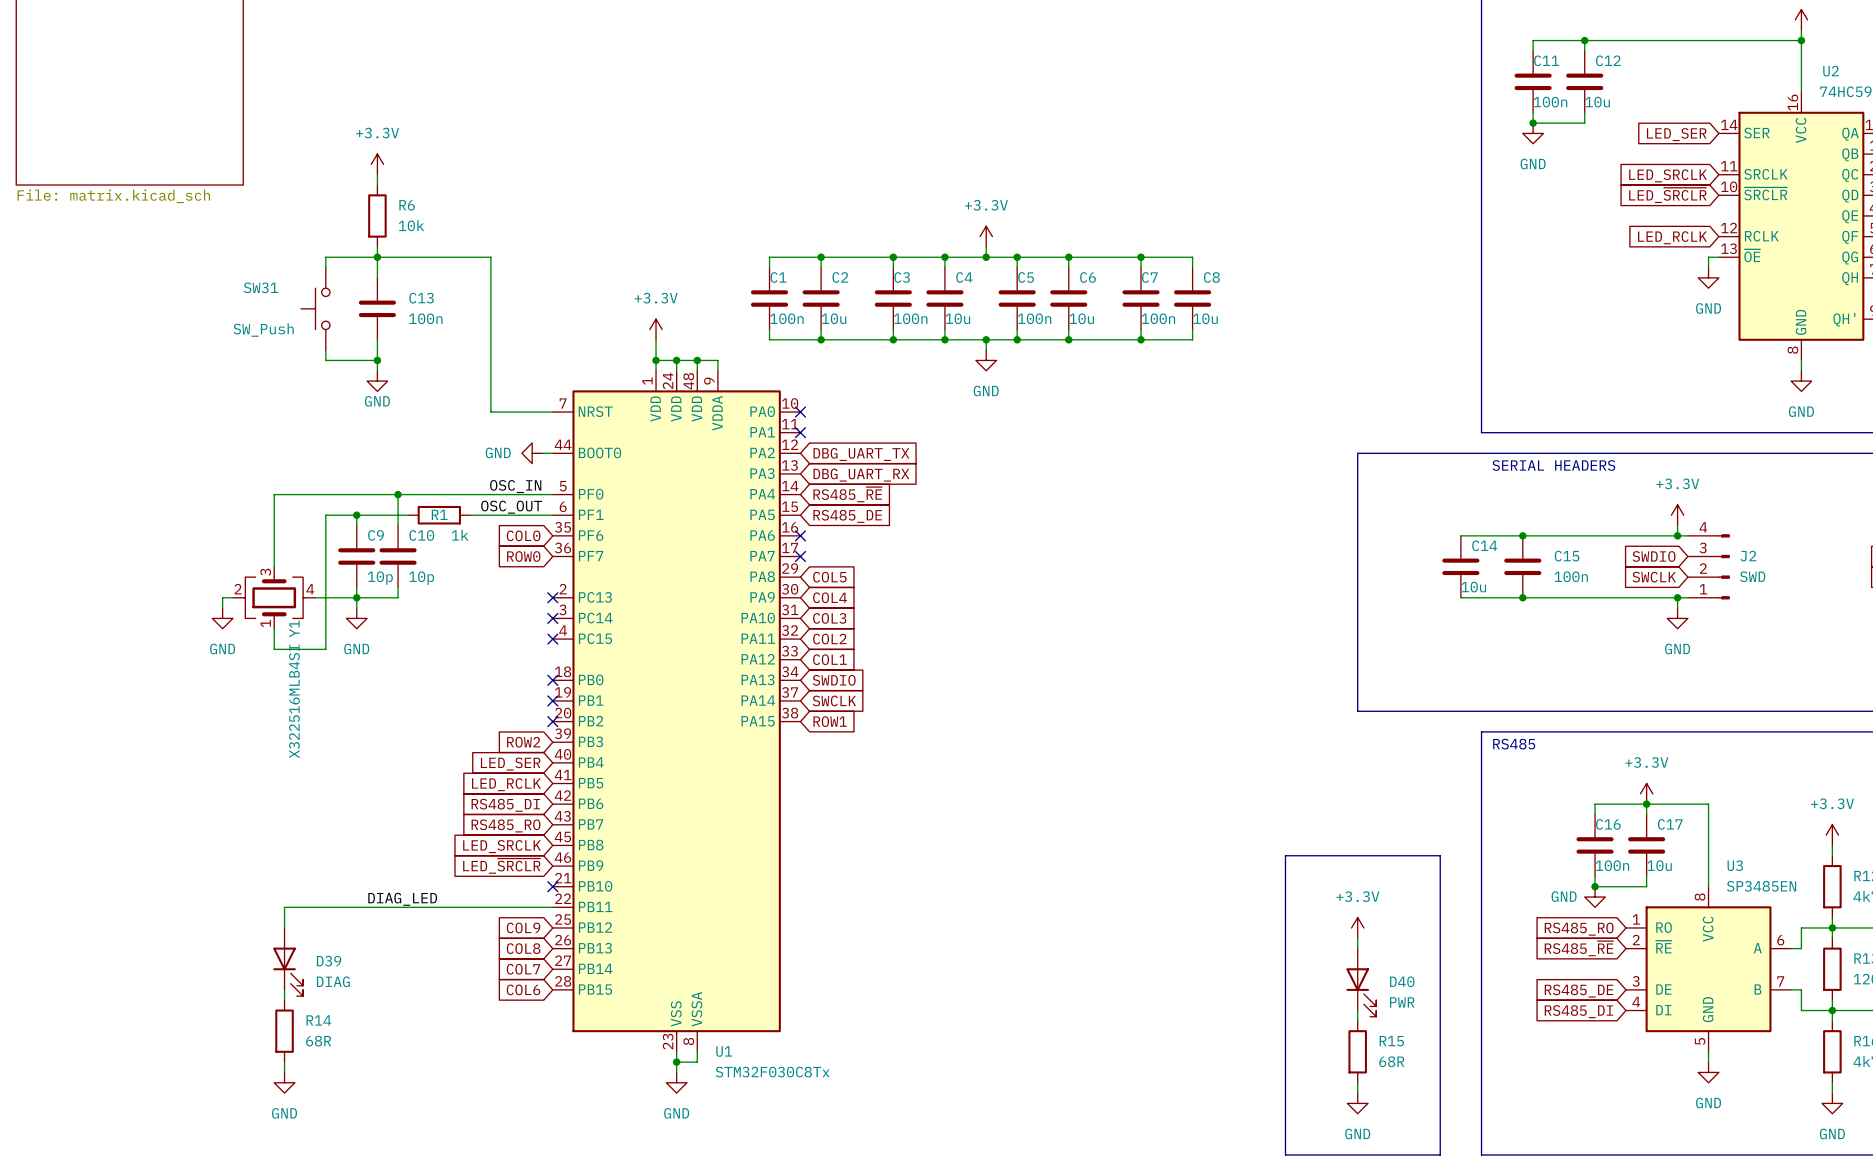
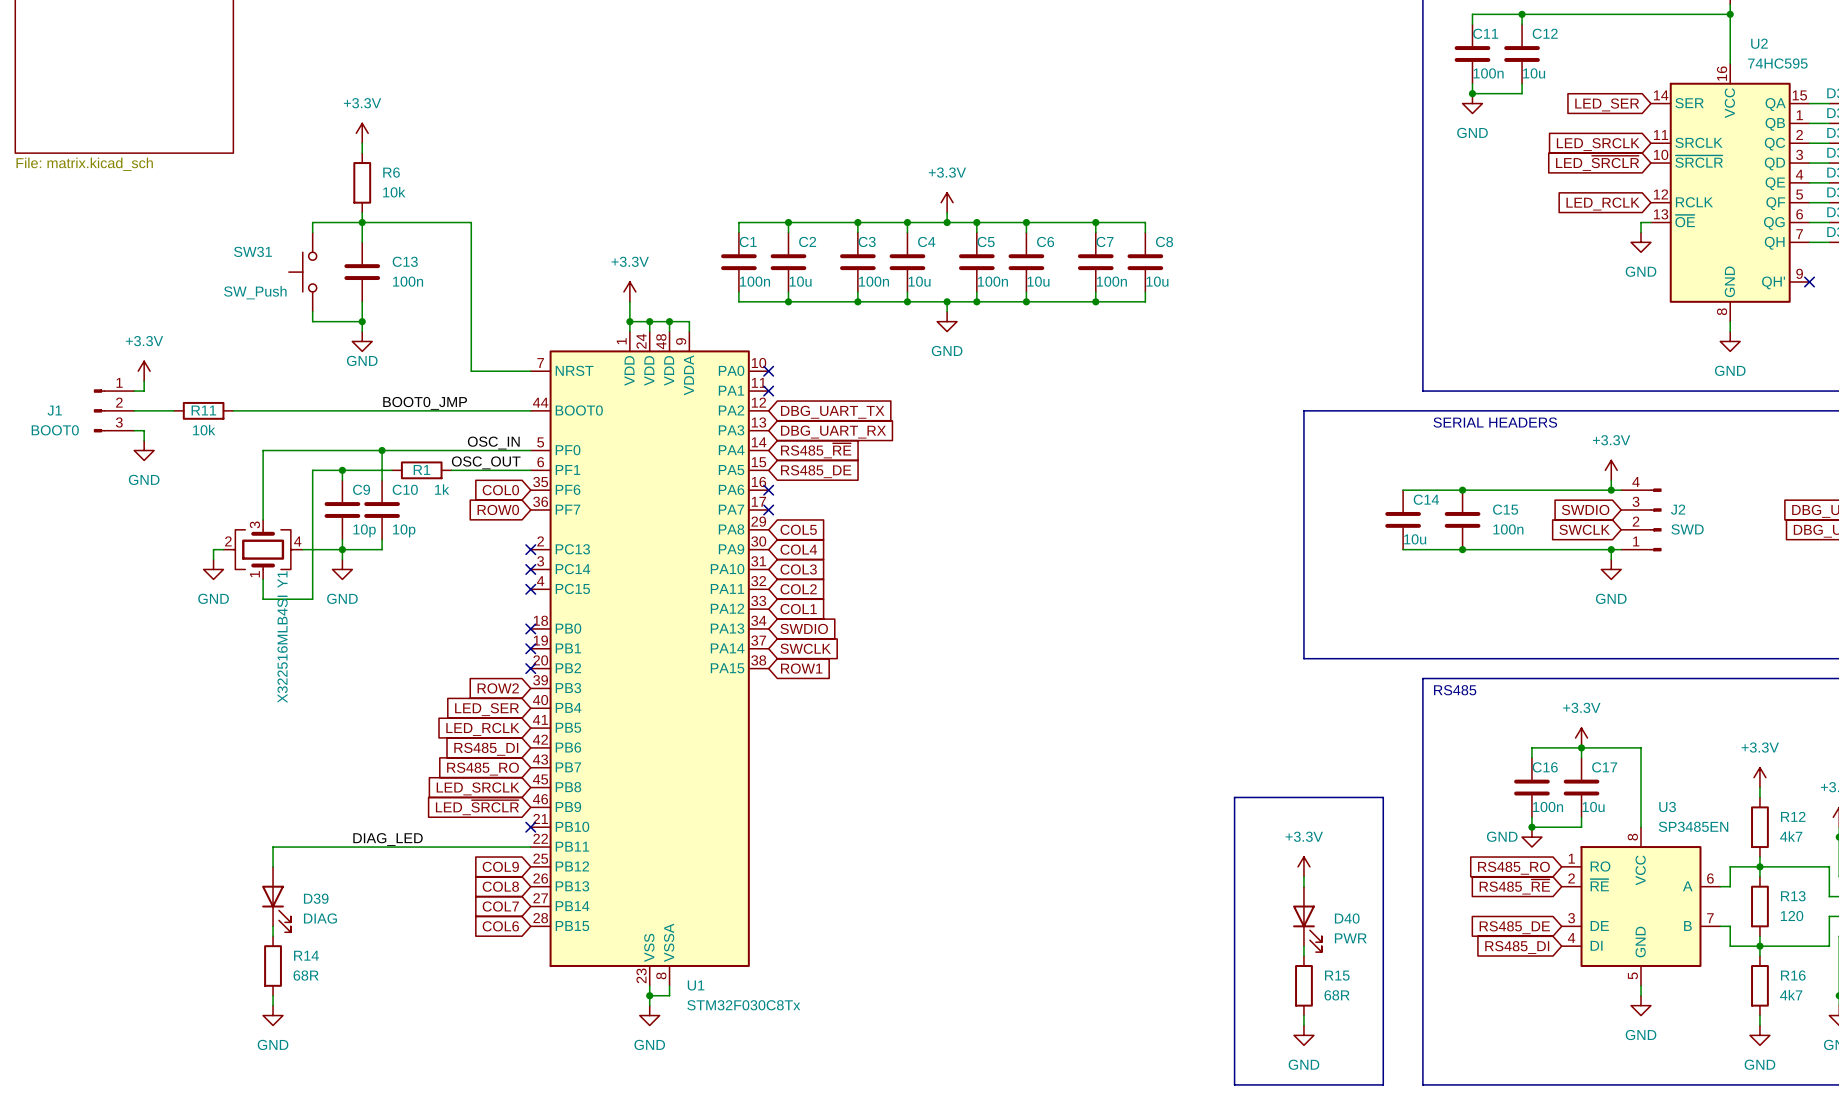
power symbol: none -> +3.3V (144, 371)
wire: none -> (144, 381) (144, 391) (134, 391)
label: none -> BOOT0_JMP (425, 403)
J1: none -> BOOT0 (114, 410)
wire: none -> (134, 410) (173, 410)
R11: none -> 10k (203, 410)
wire: none -> (233, 410) (520, 410)
power symbol: GND (532, 453) -> none
wire: none -> (134, 430) (144, 430) (144, 440)
power symbol: none -> GND (144, 450)

